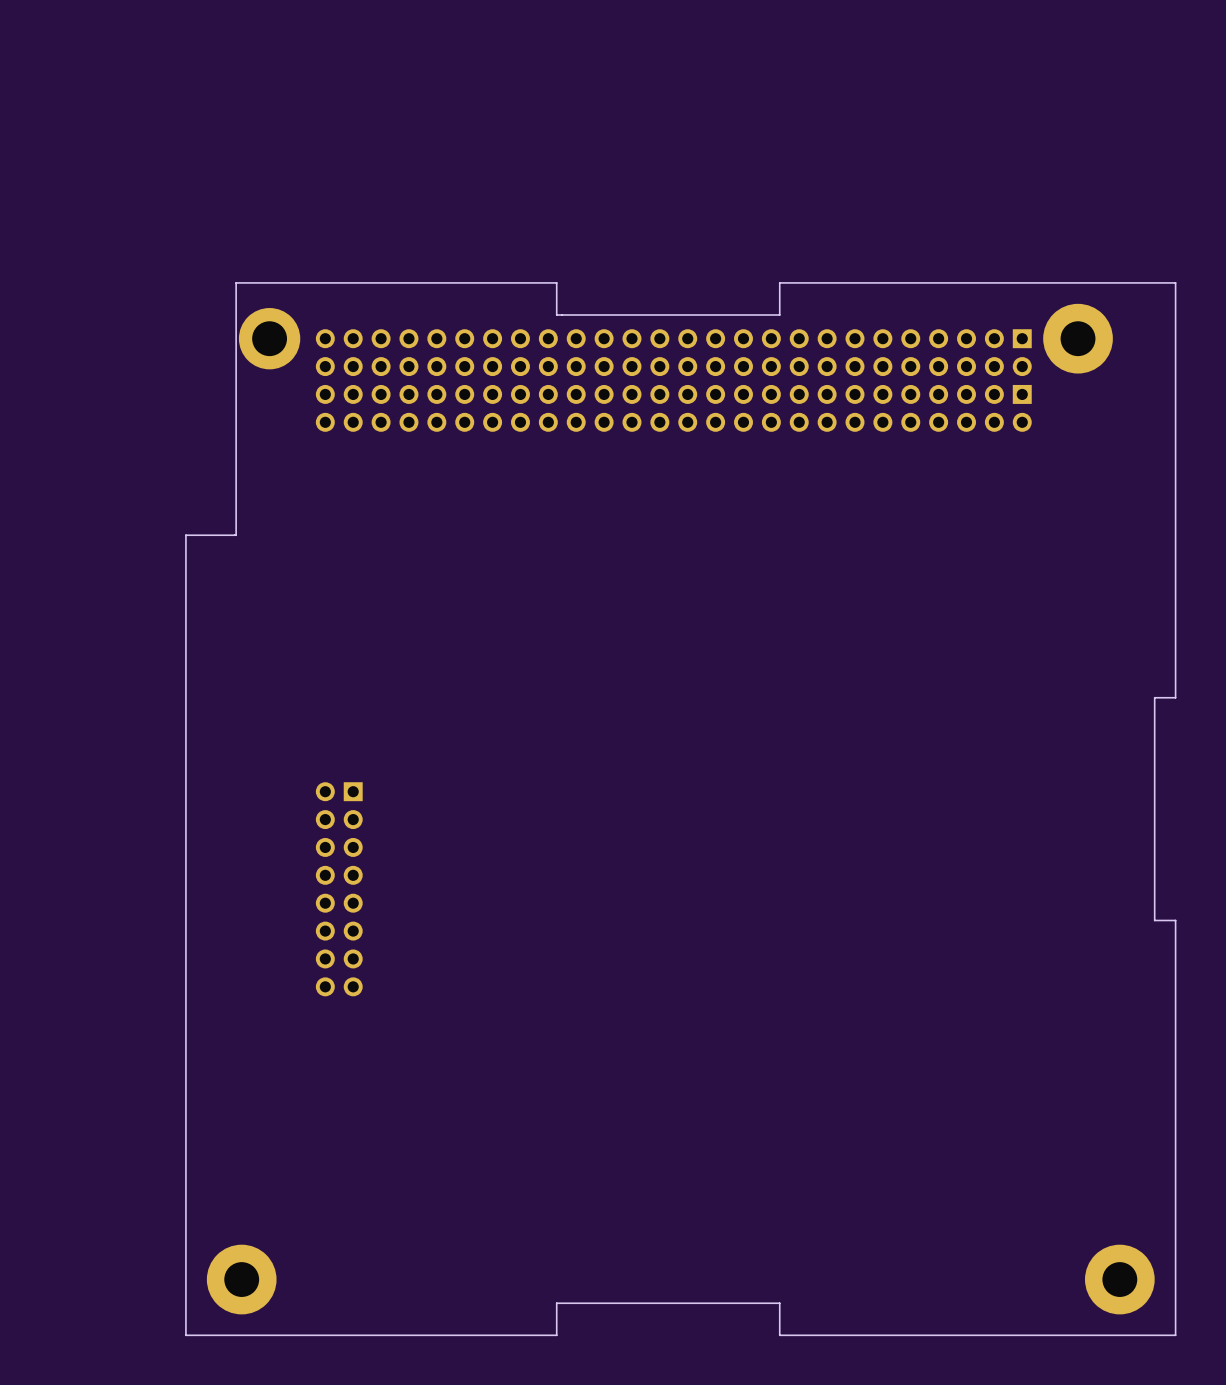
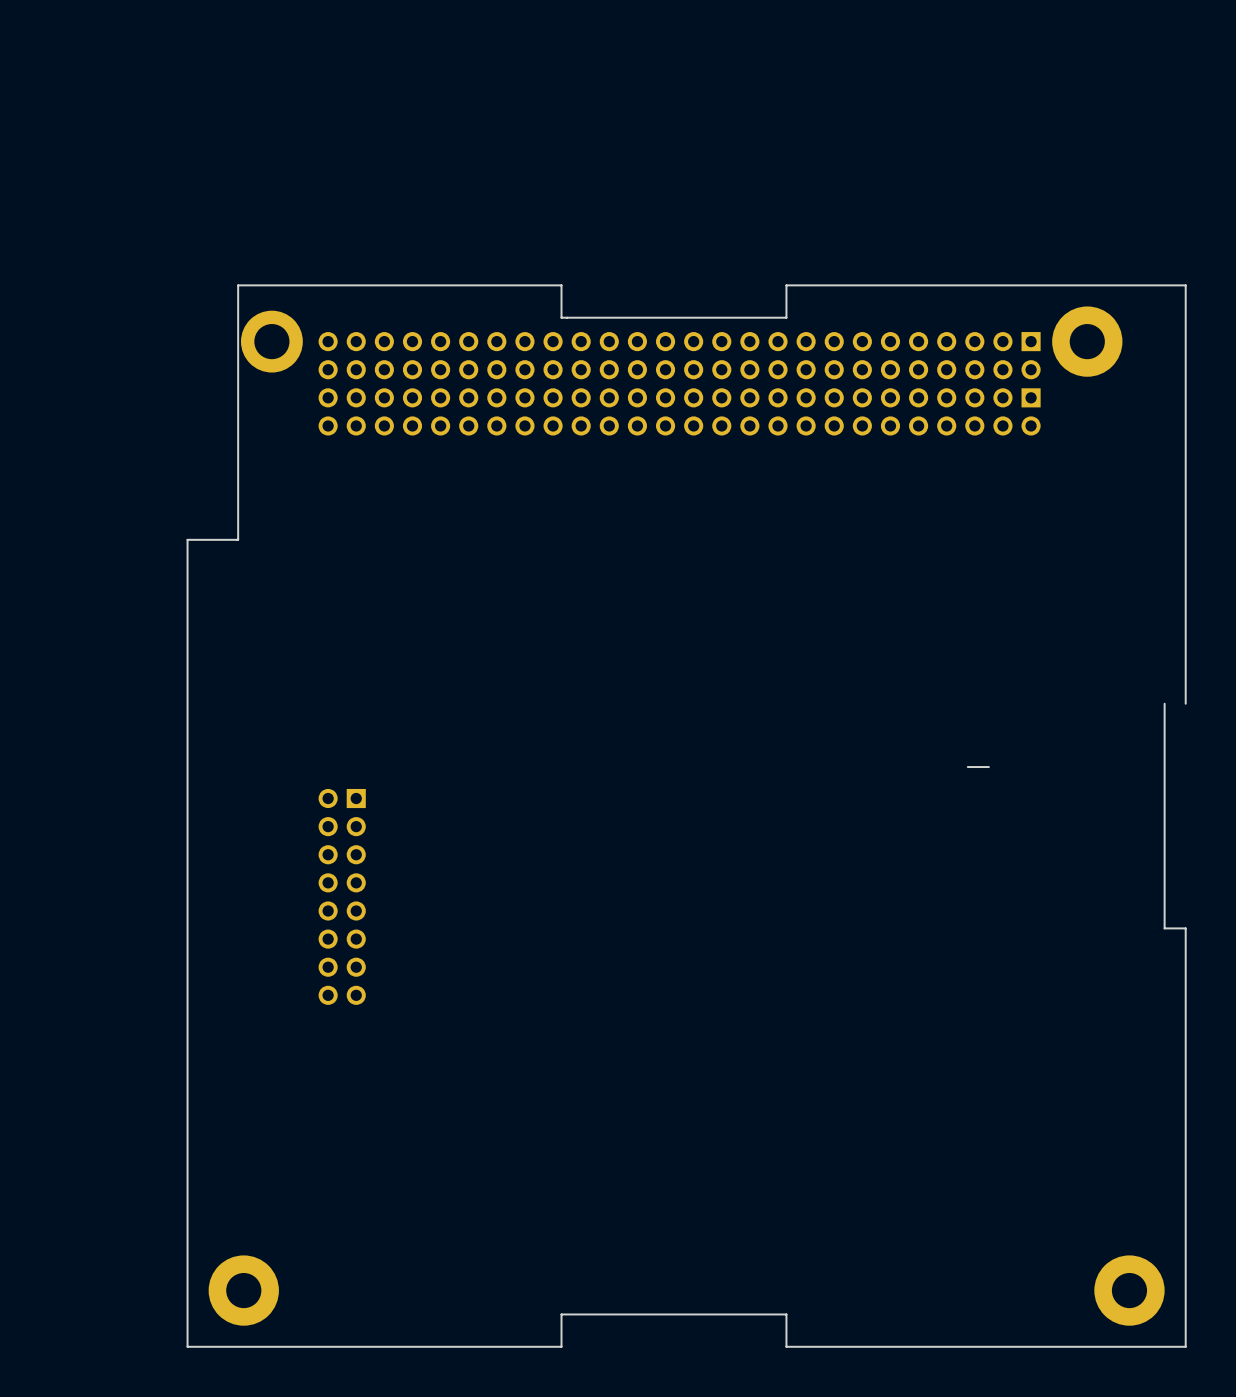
board edge: (1175, 697) (1154, 697) -> (988, 767) (967, 767)

